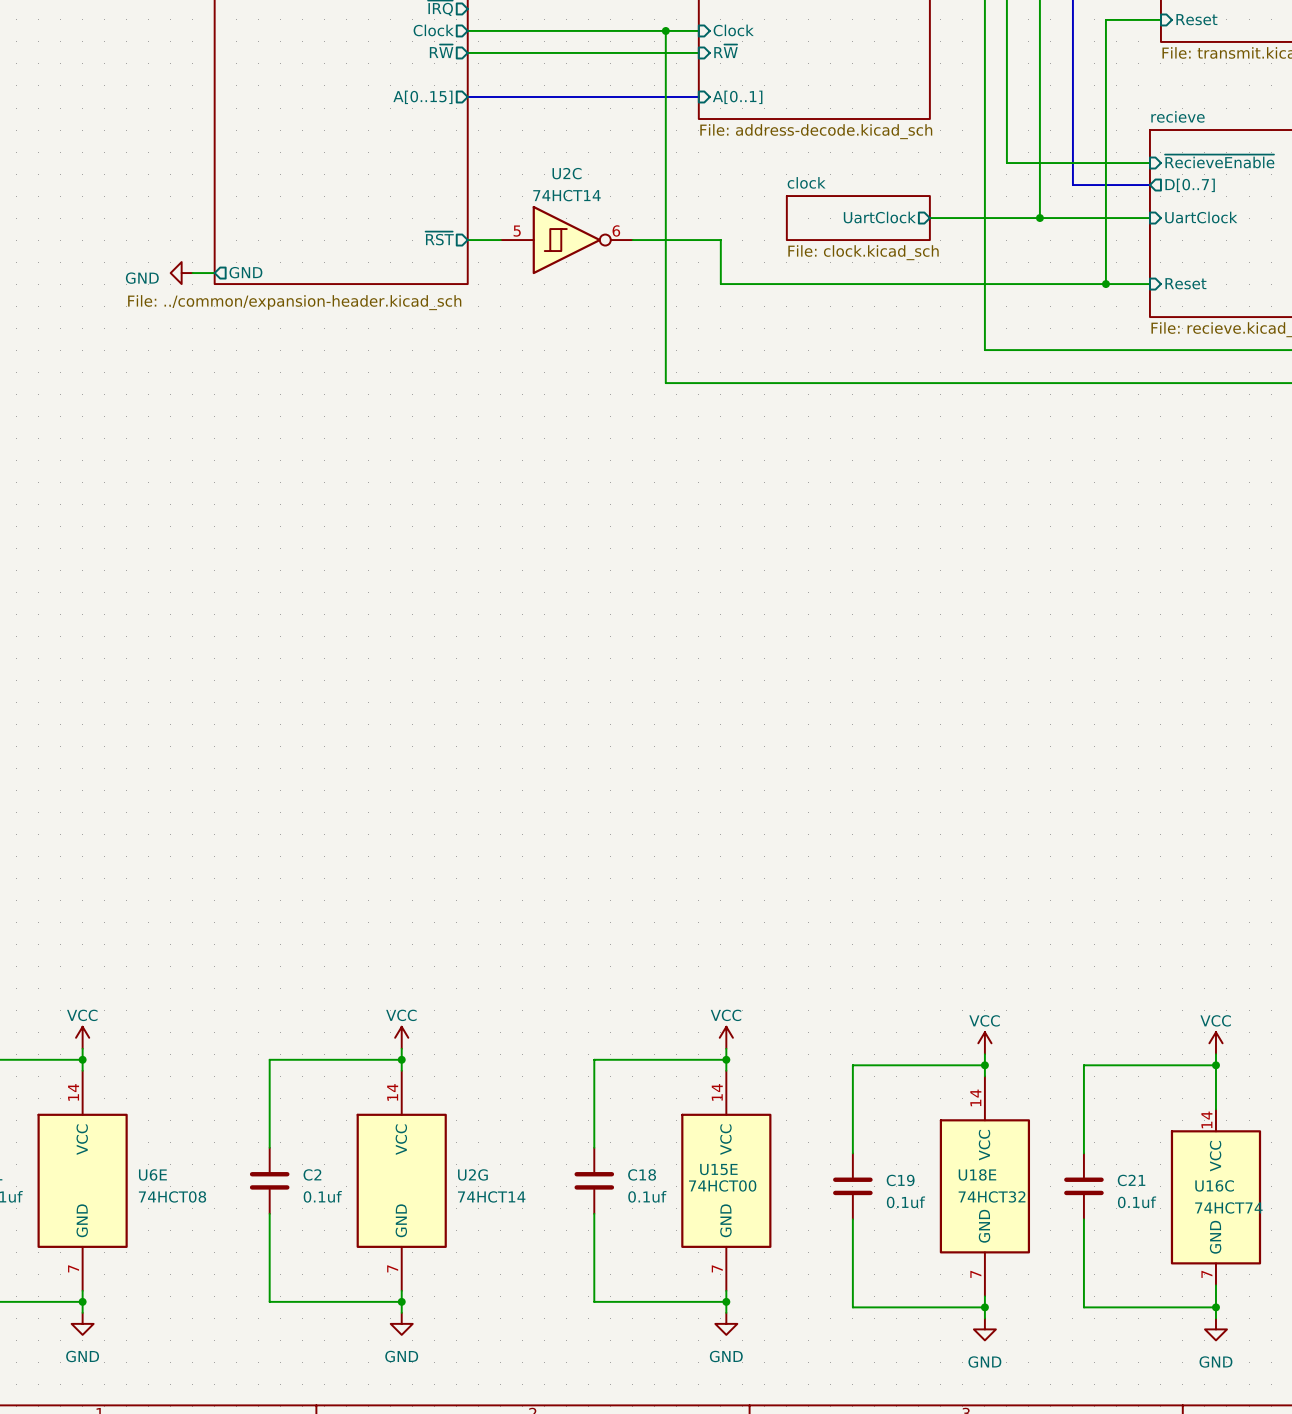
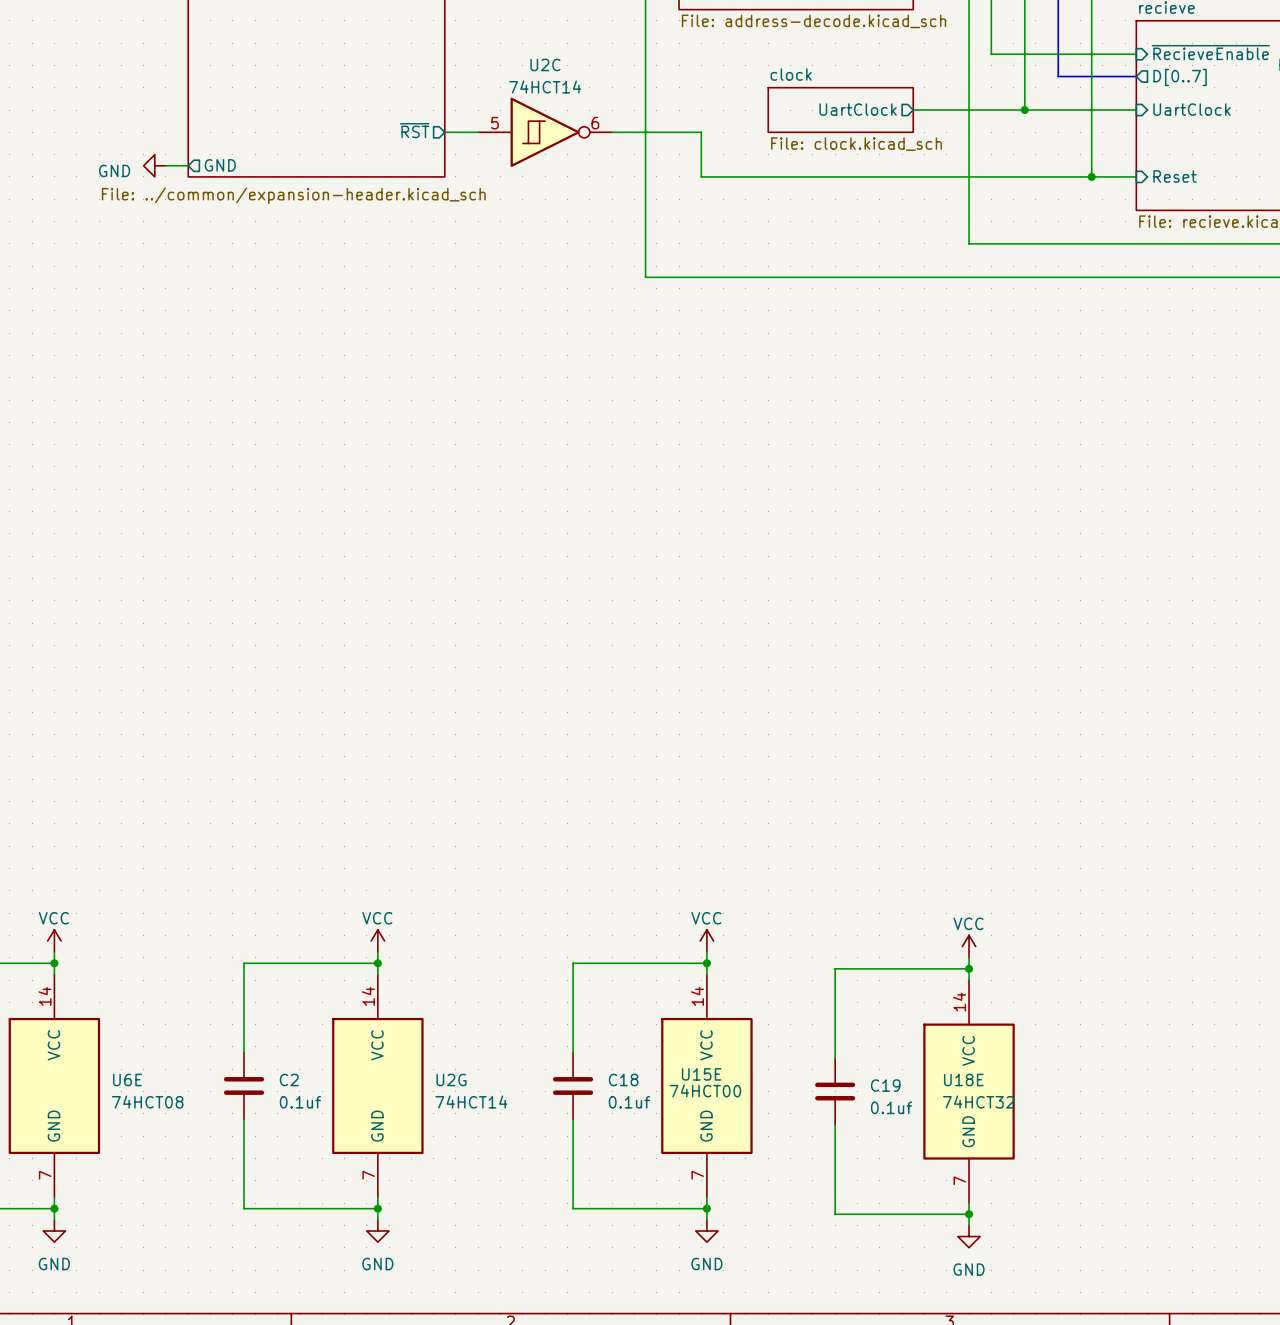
power symbol: VCC (1215, 1043) -> none
wire: (1215, 1054) (1215, 1109) -> none
wire: (1215, 1065) (1083, 1065) (1083, 1153) -> none
junction: (1215, 1065) -> none
C21: 0.1uf (1083, 1186) -> none
U16C: 74HCT74 (1215, 1197) -> none
wire: (1083, 1219) (1083, 1307) (1215, 1307) -> none
wire: (1215, 1285) (1215, 1318) -> none
junction: (1215, 1307) -> none
power symbol: GND (1215, 1329) -> none

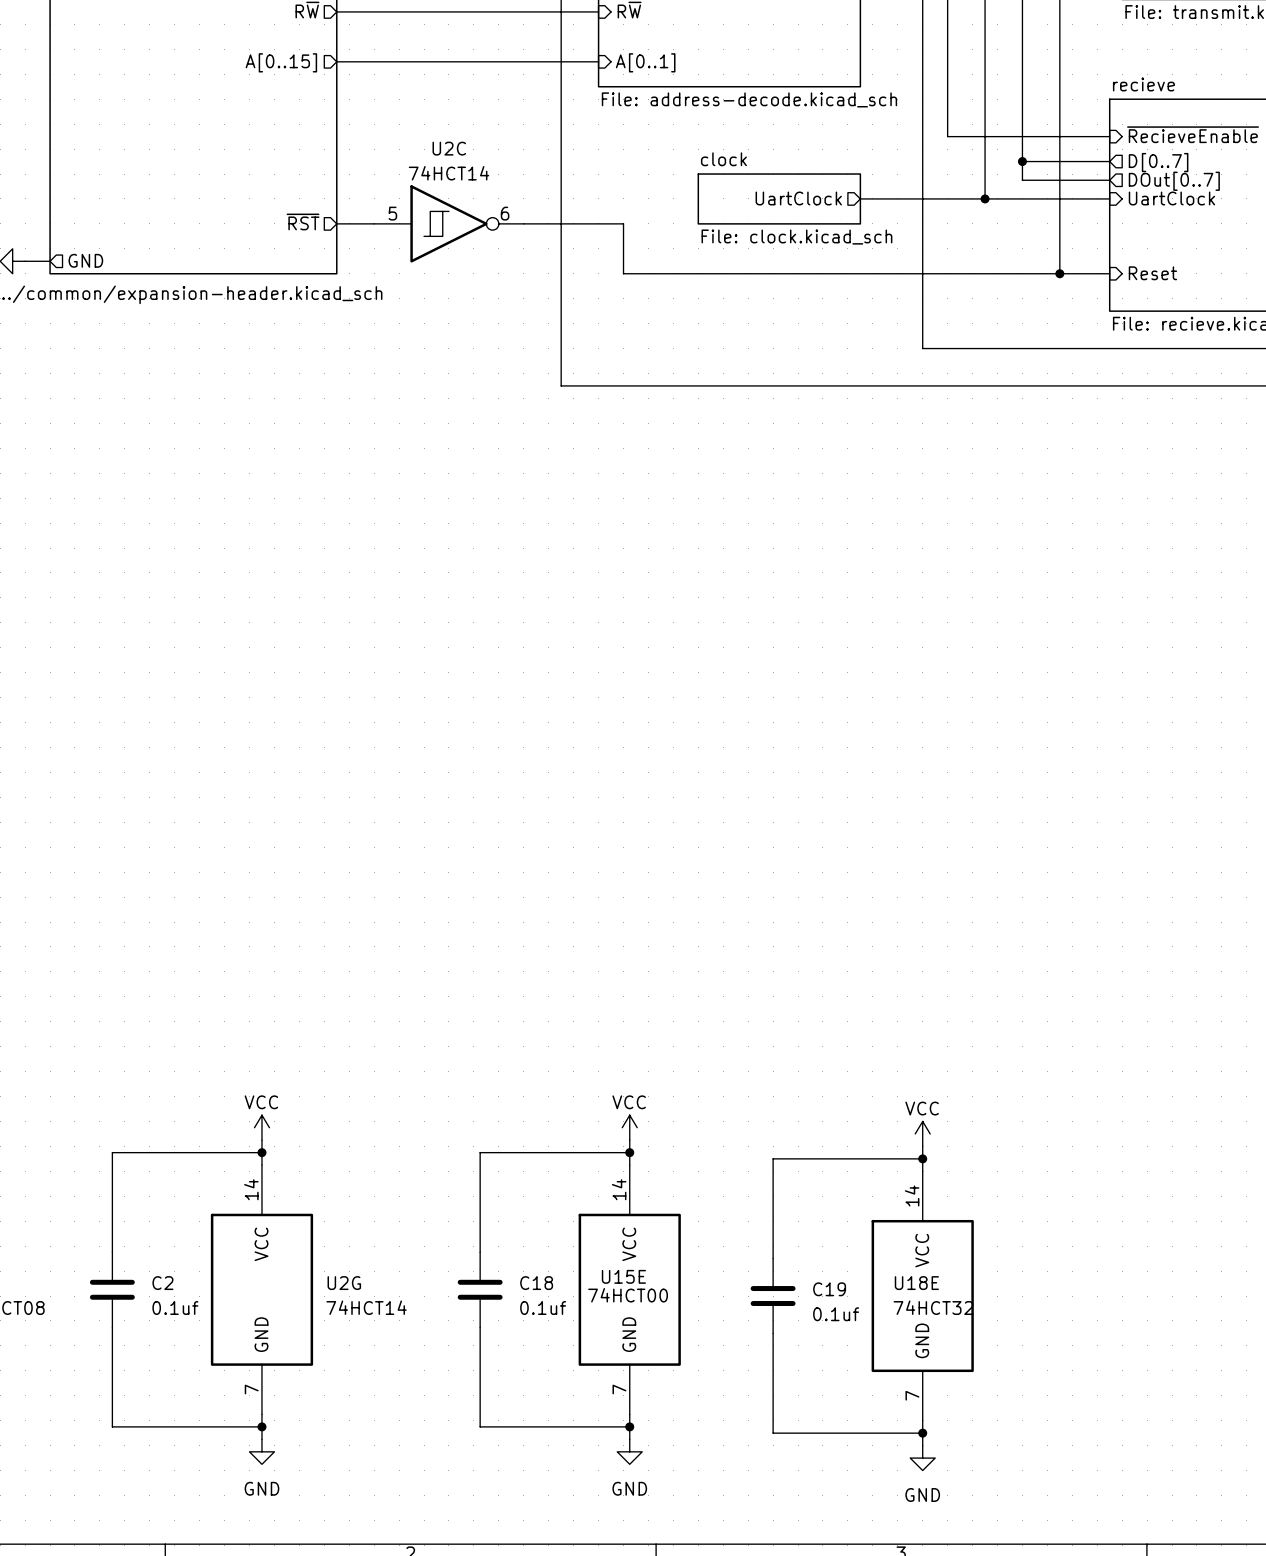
bus: none -> (1022, 161) (1022, 180) (1109, 180)
junction: none -> (1022, 161)
sheet pin: none -> DOut[0..7] (1174, 181)

